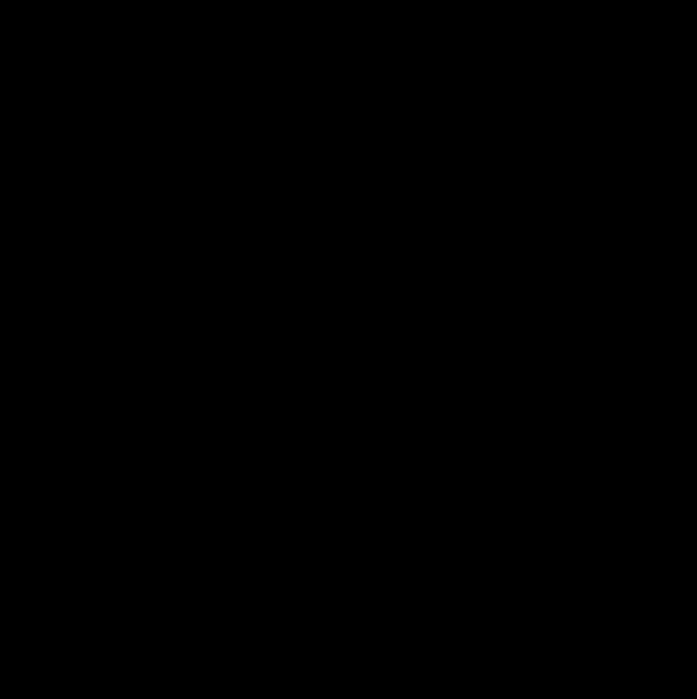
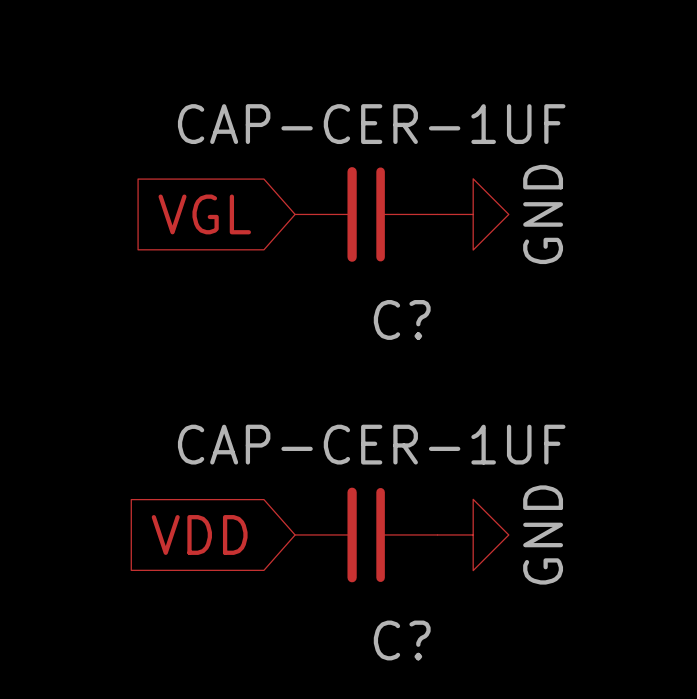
global label: none -> VGL (204, 214)
C?: none -> CAP-CER-1UF (366, 214)
power symbol: none -> GND (473, 214)
global label: none -> VDD (199, 534)
C?: none -> CAP-CER-1UF (366, 534)
power symbol: none -> GND (473, 534)

